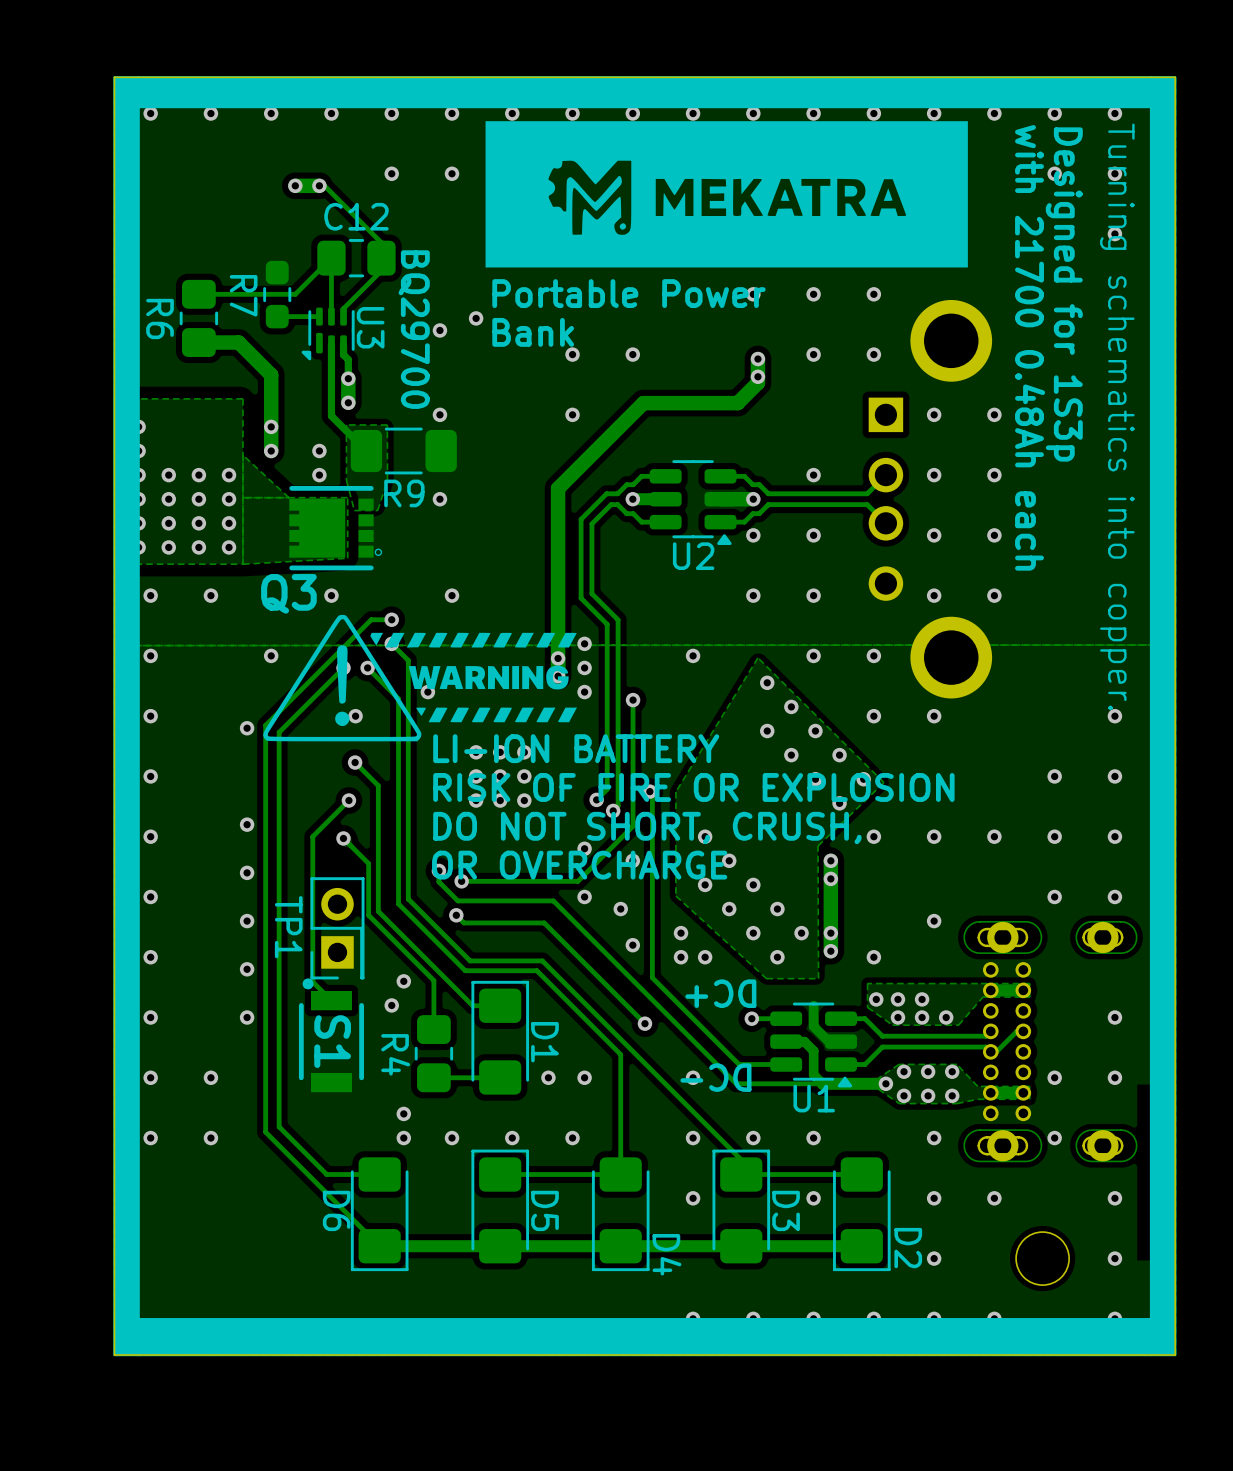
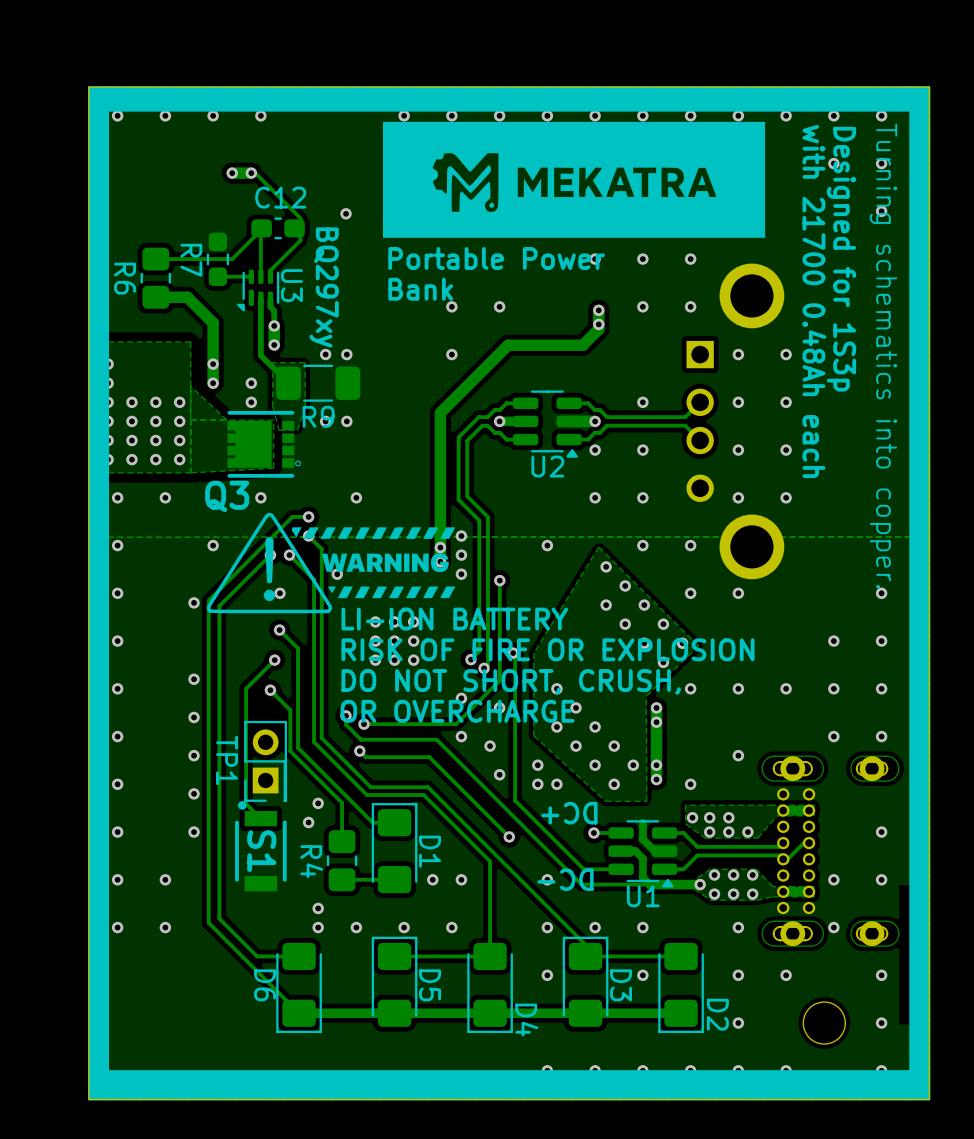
via: (391, 113) -> none
via: (452, 113) -> none
via: (391, 173) -> none
via: (452, 173) -> none
via: none -> (346, 213)
C12 footprint: [317, 238, 396, 278] -> [251, 217, 305, 240]
via: (476, 318) -> none
U3 value: BQ29700 (414, 329) -> BQ297xy (324, 287)
via: (439, 330) -> none
via: none -> (325, 354)
via: none -> (325, 421)

